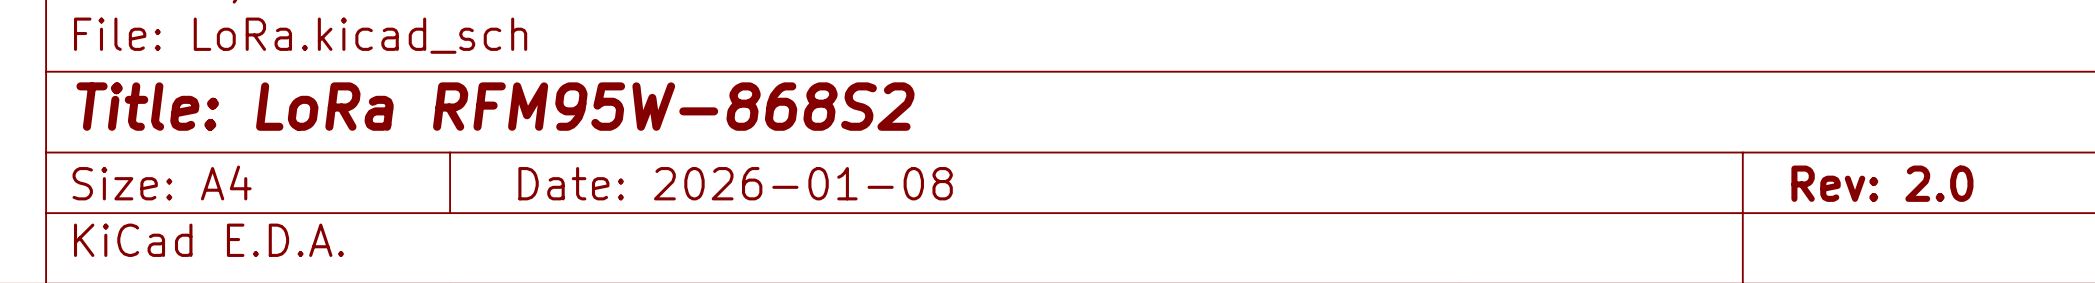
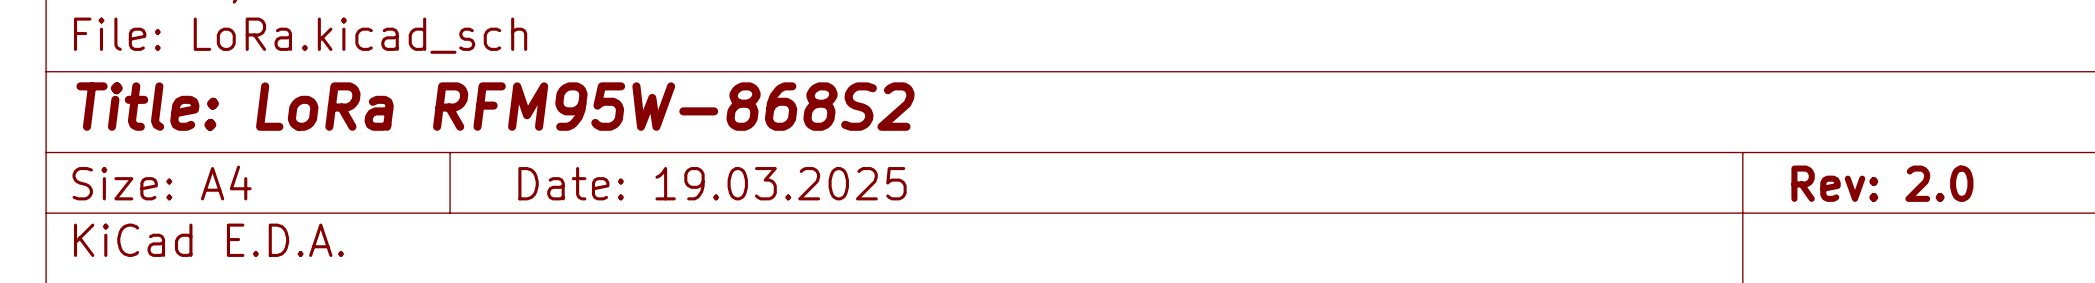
title block: Date: 2026-01-08 (735, 183) -> Date: 19.03.2025 (712, 183)

